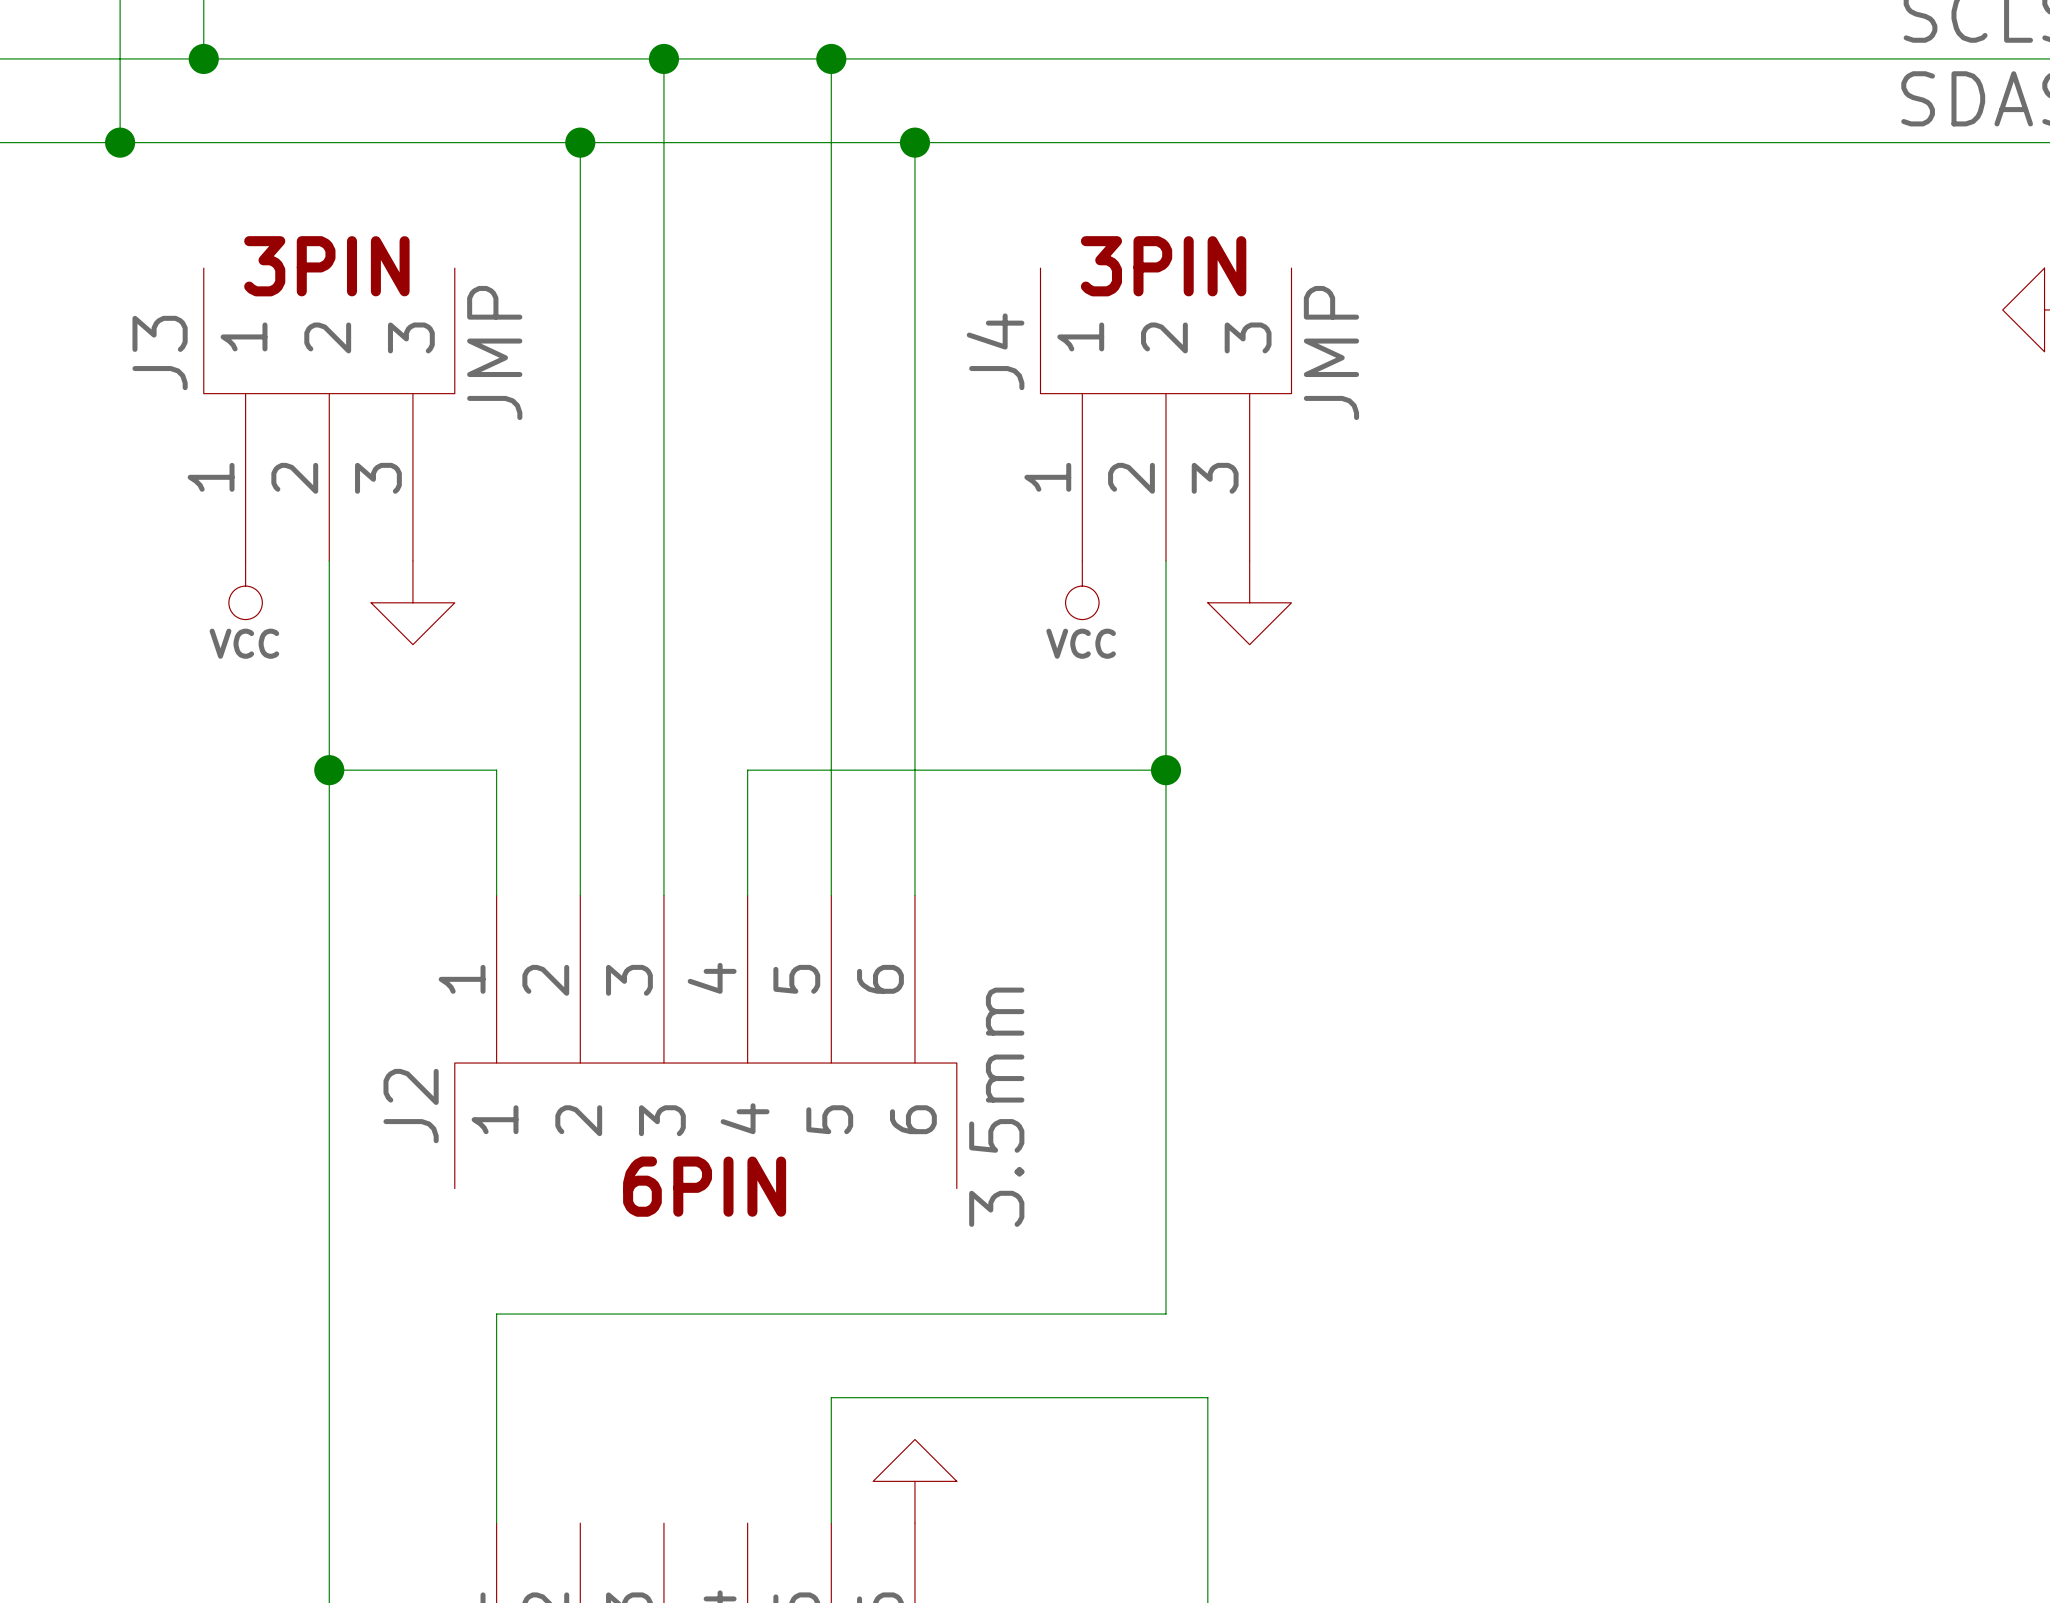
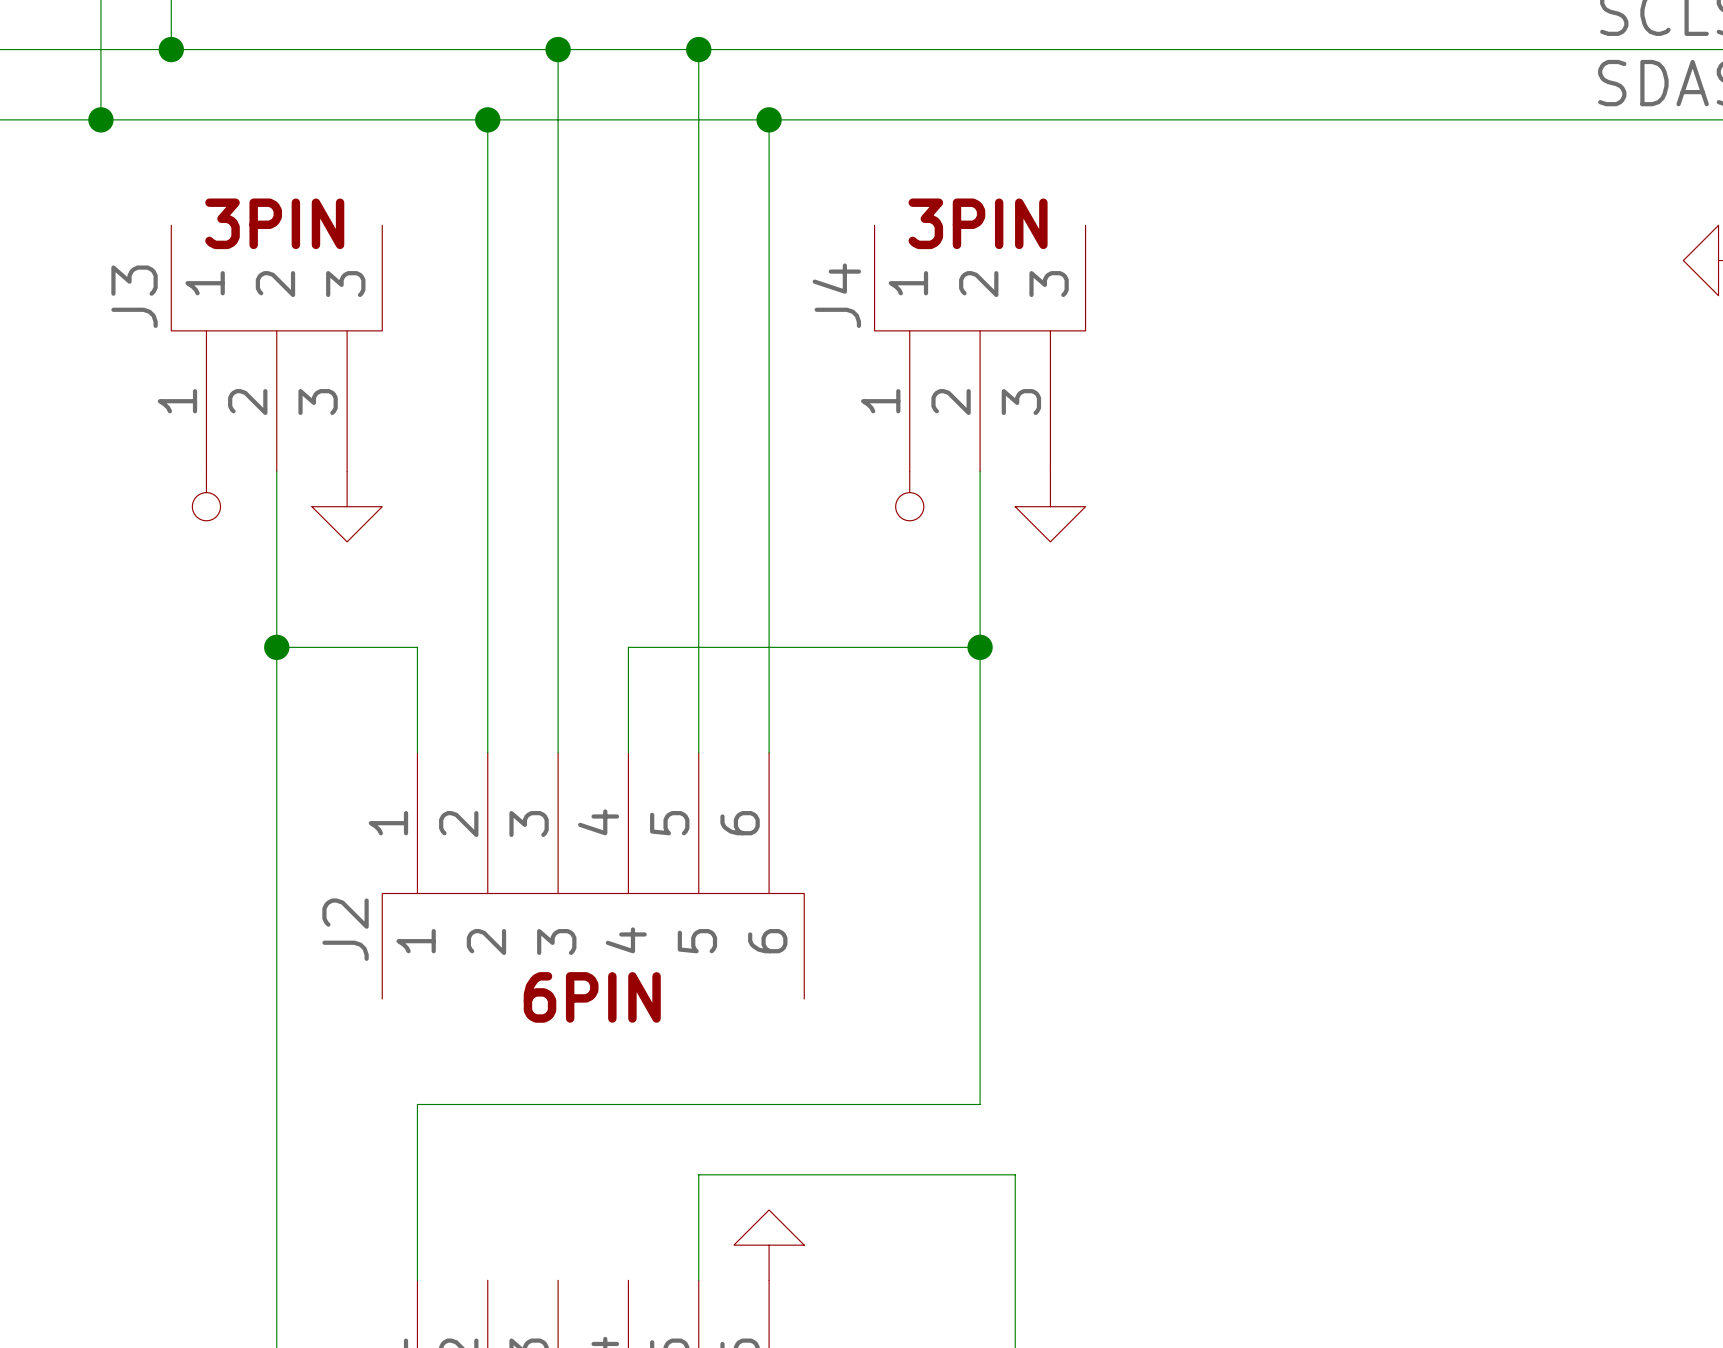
J3 value: JMP (494, 353) -> none
J4 value: JMP (1331, 353) -> none
power symbol text: VCC (244, 643) -> none
power symbol text: VCC (1081, 643) -> none
J2 value: 3.5mm (996, 1107) -> none

